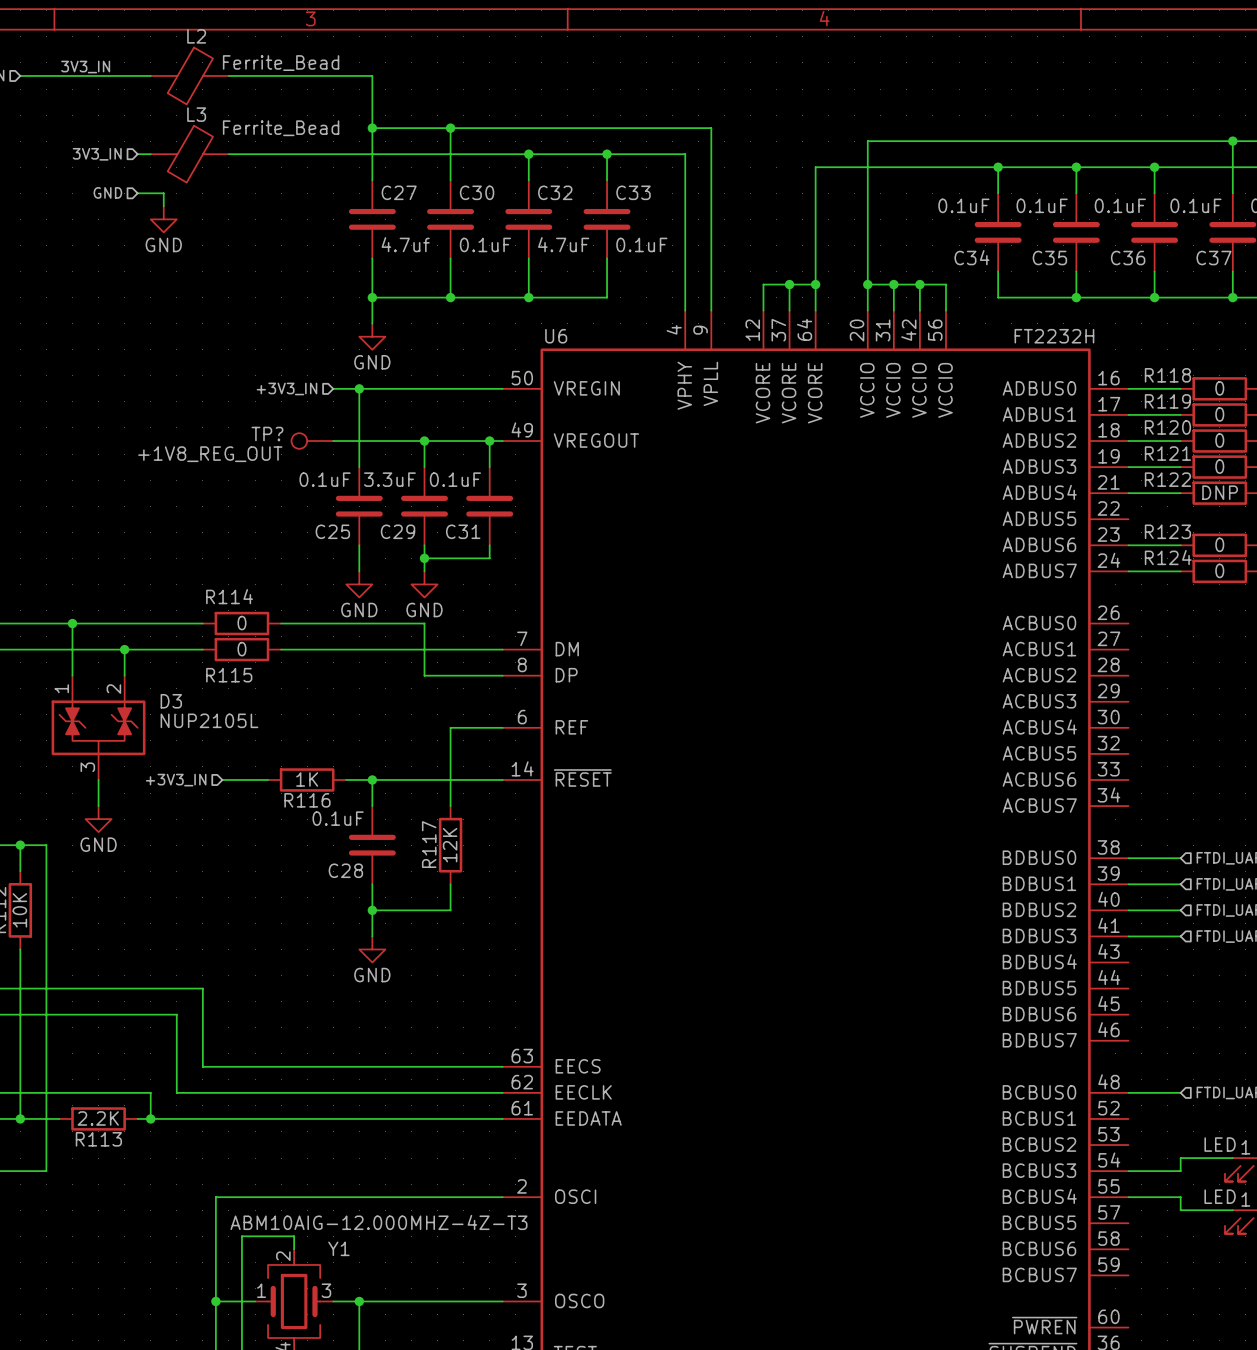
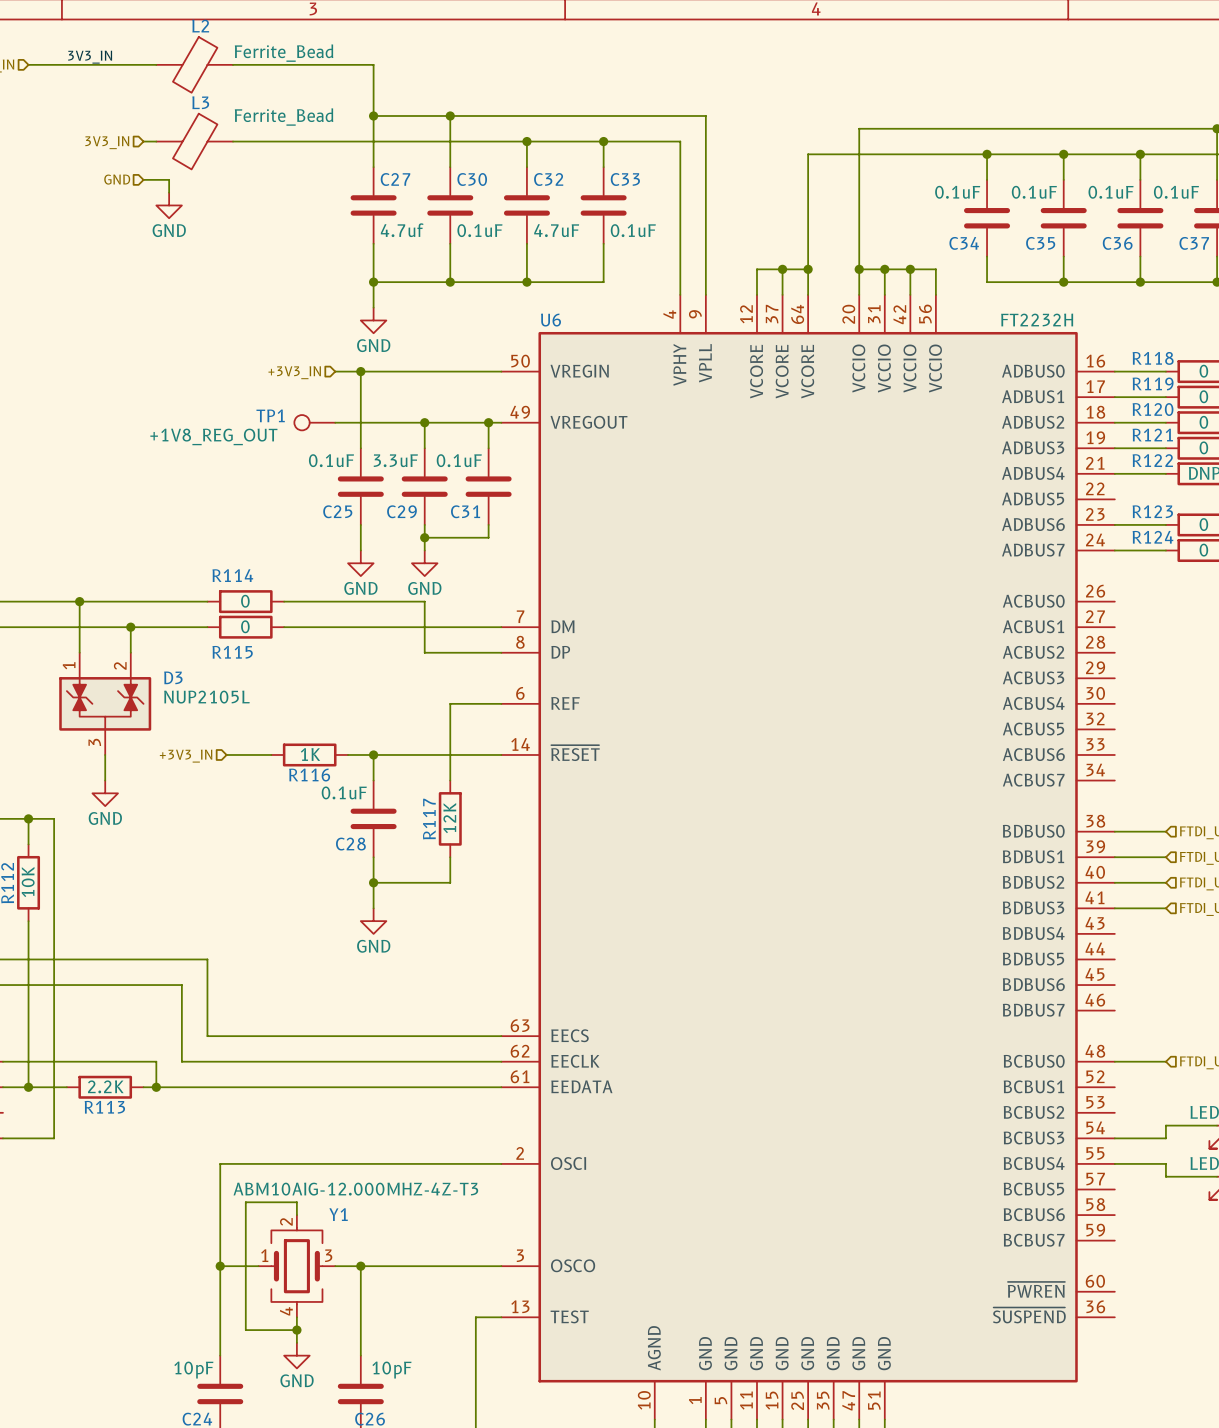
TP? name: TP? (267, 434) -> TP1 (270, 415)

